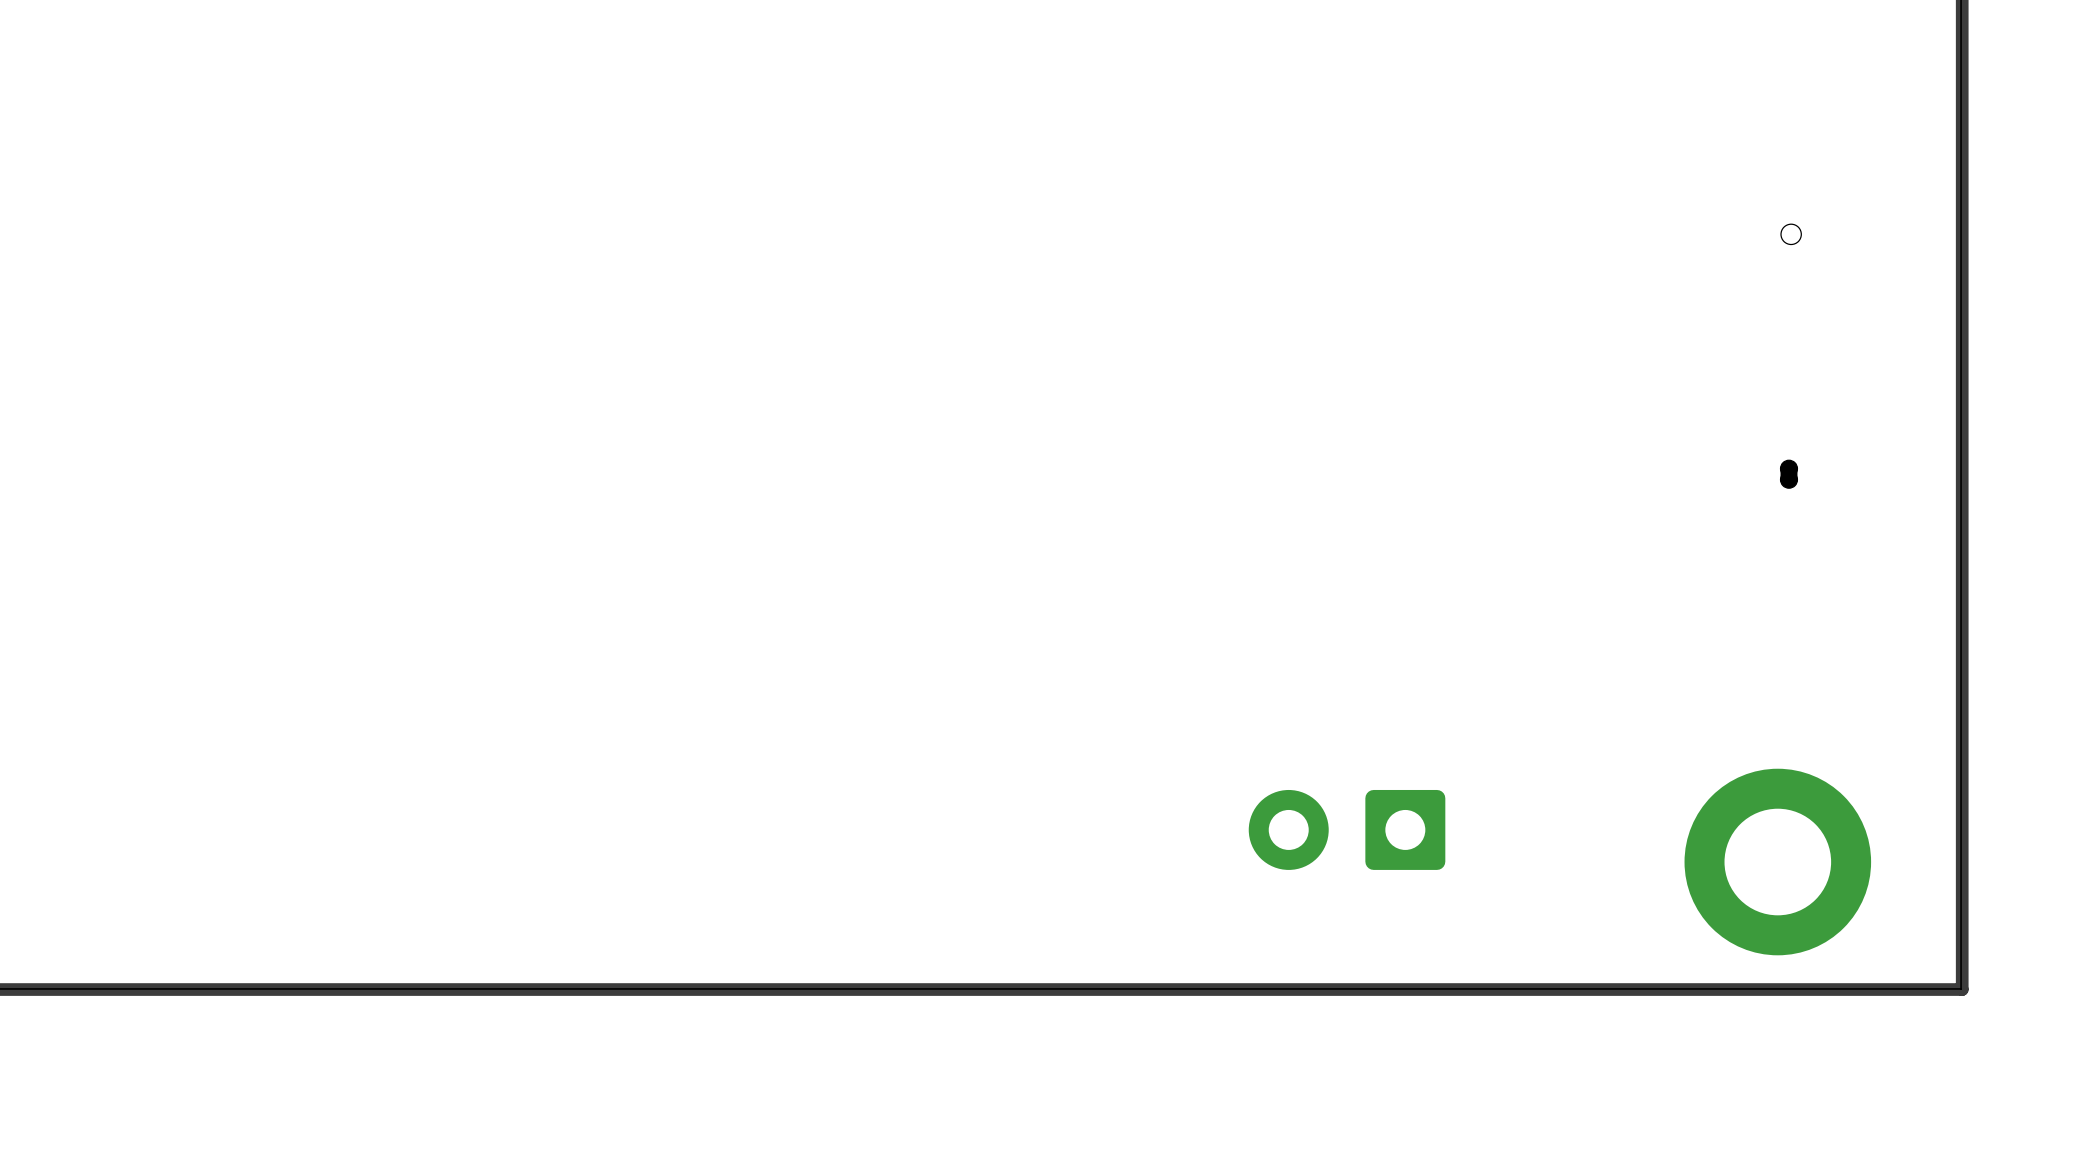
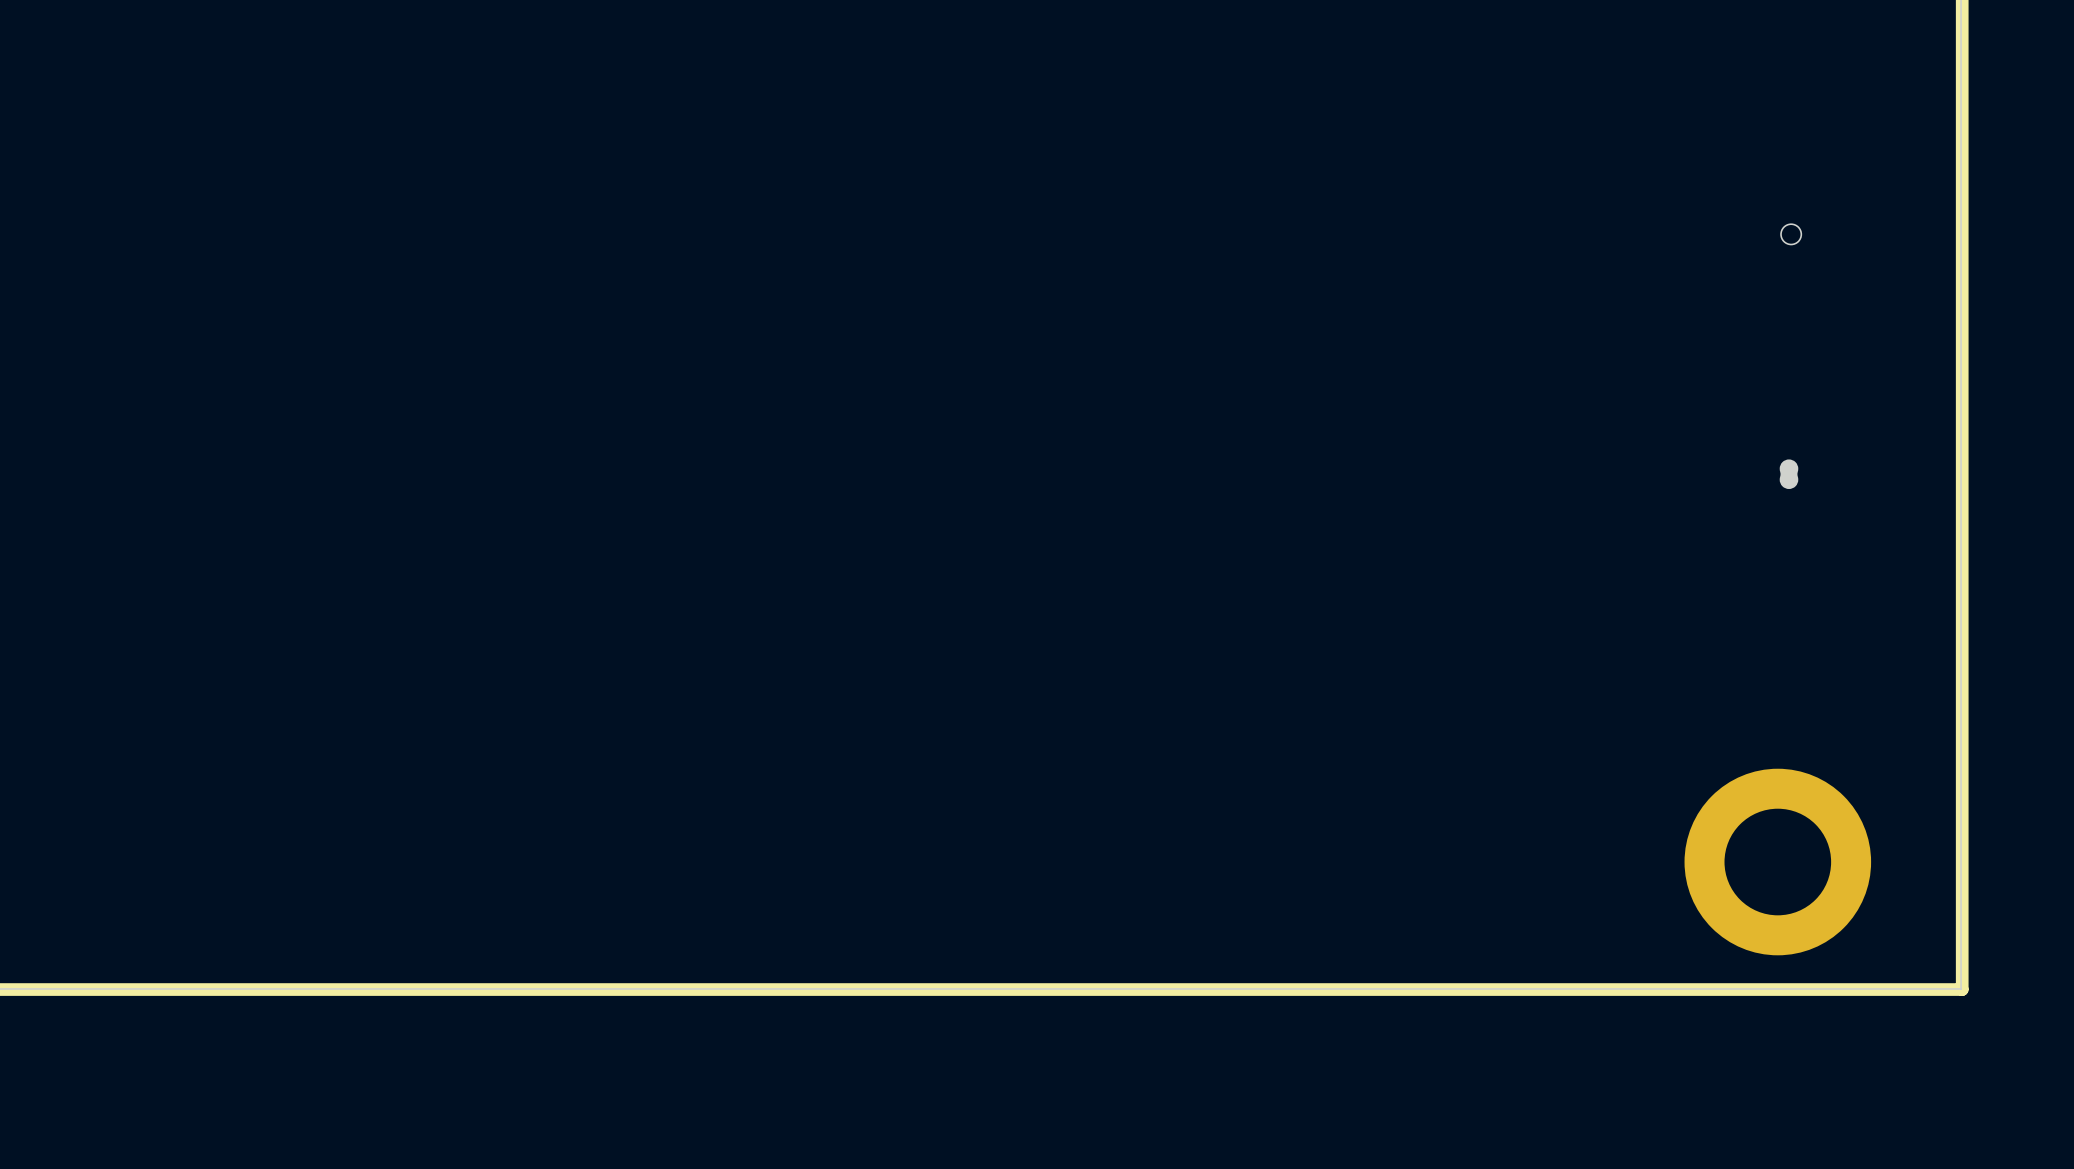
part: (1347, 829) -> none

